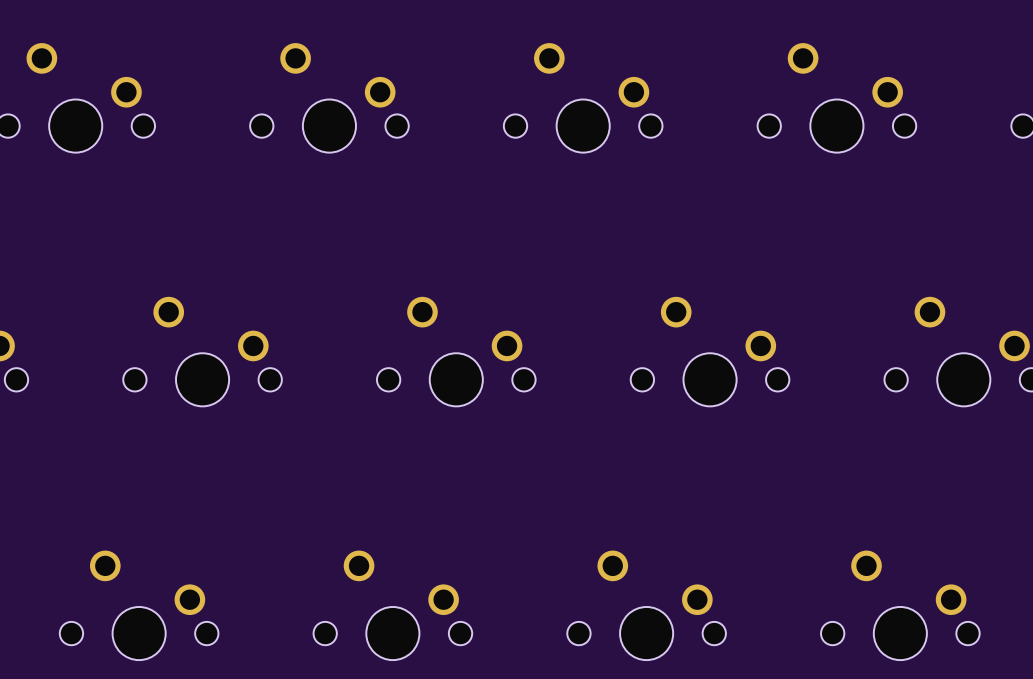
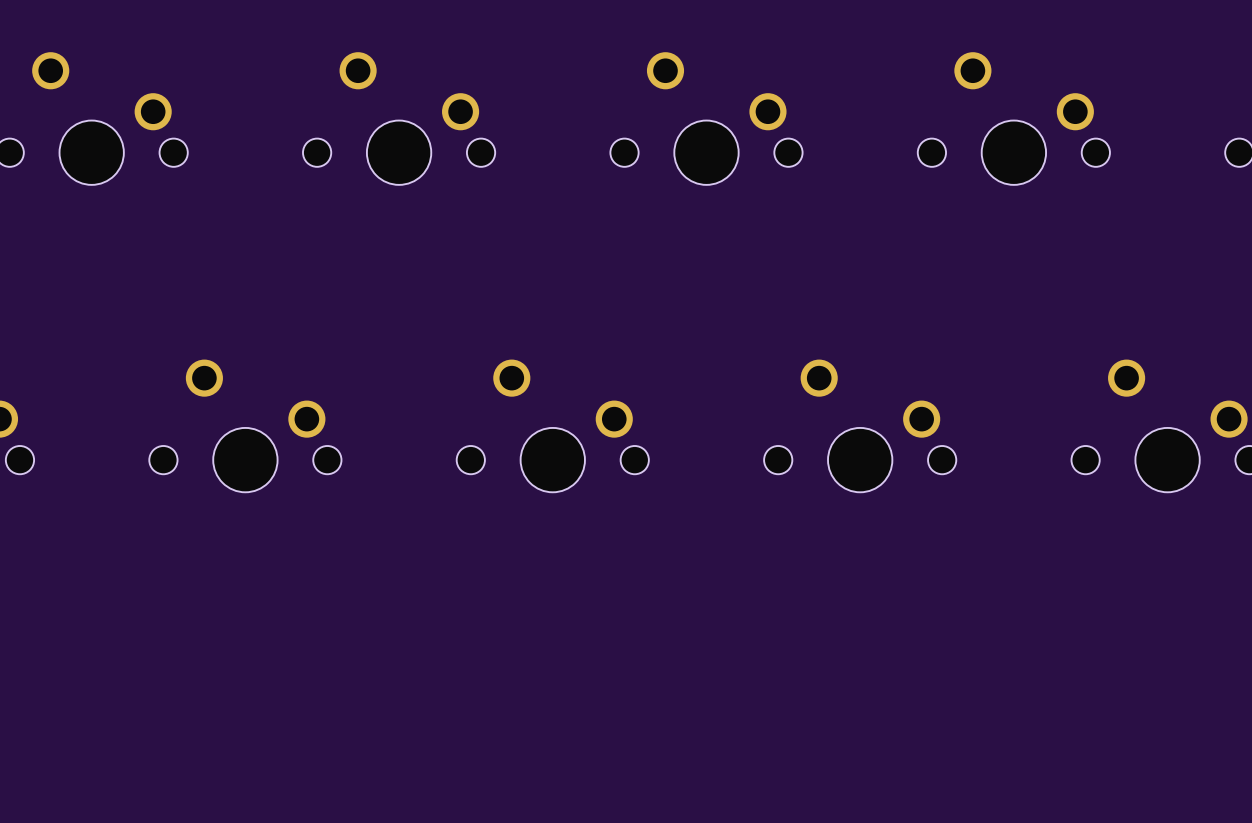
part: (139, 605) -> none
part: (392, 605) -> none
part: (646, 605) -> none
part: (900, 605) -> none

